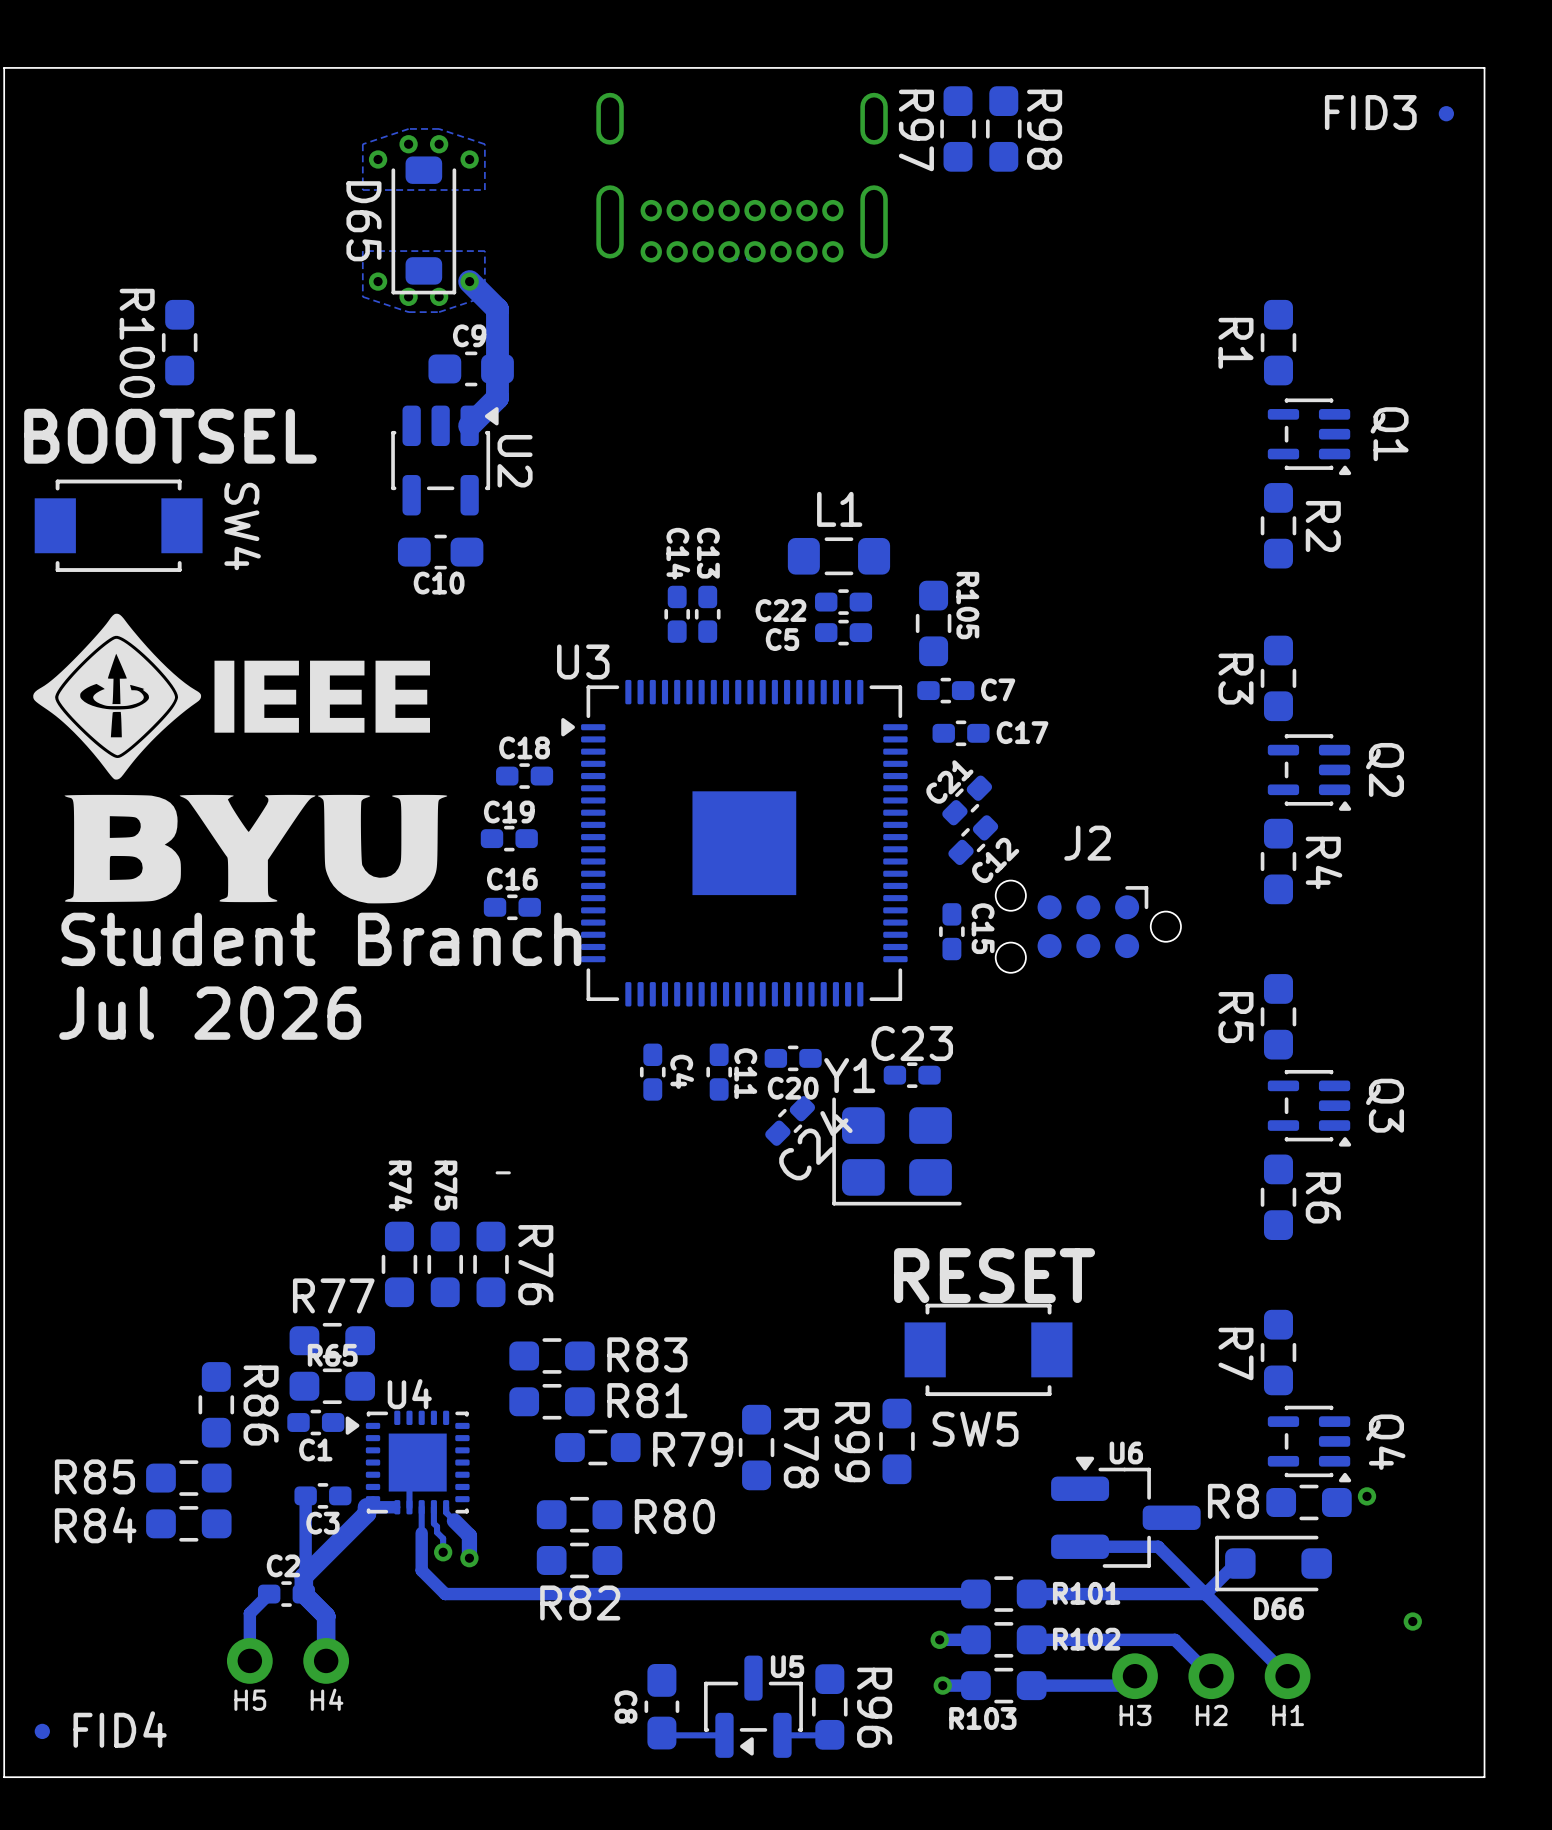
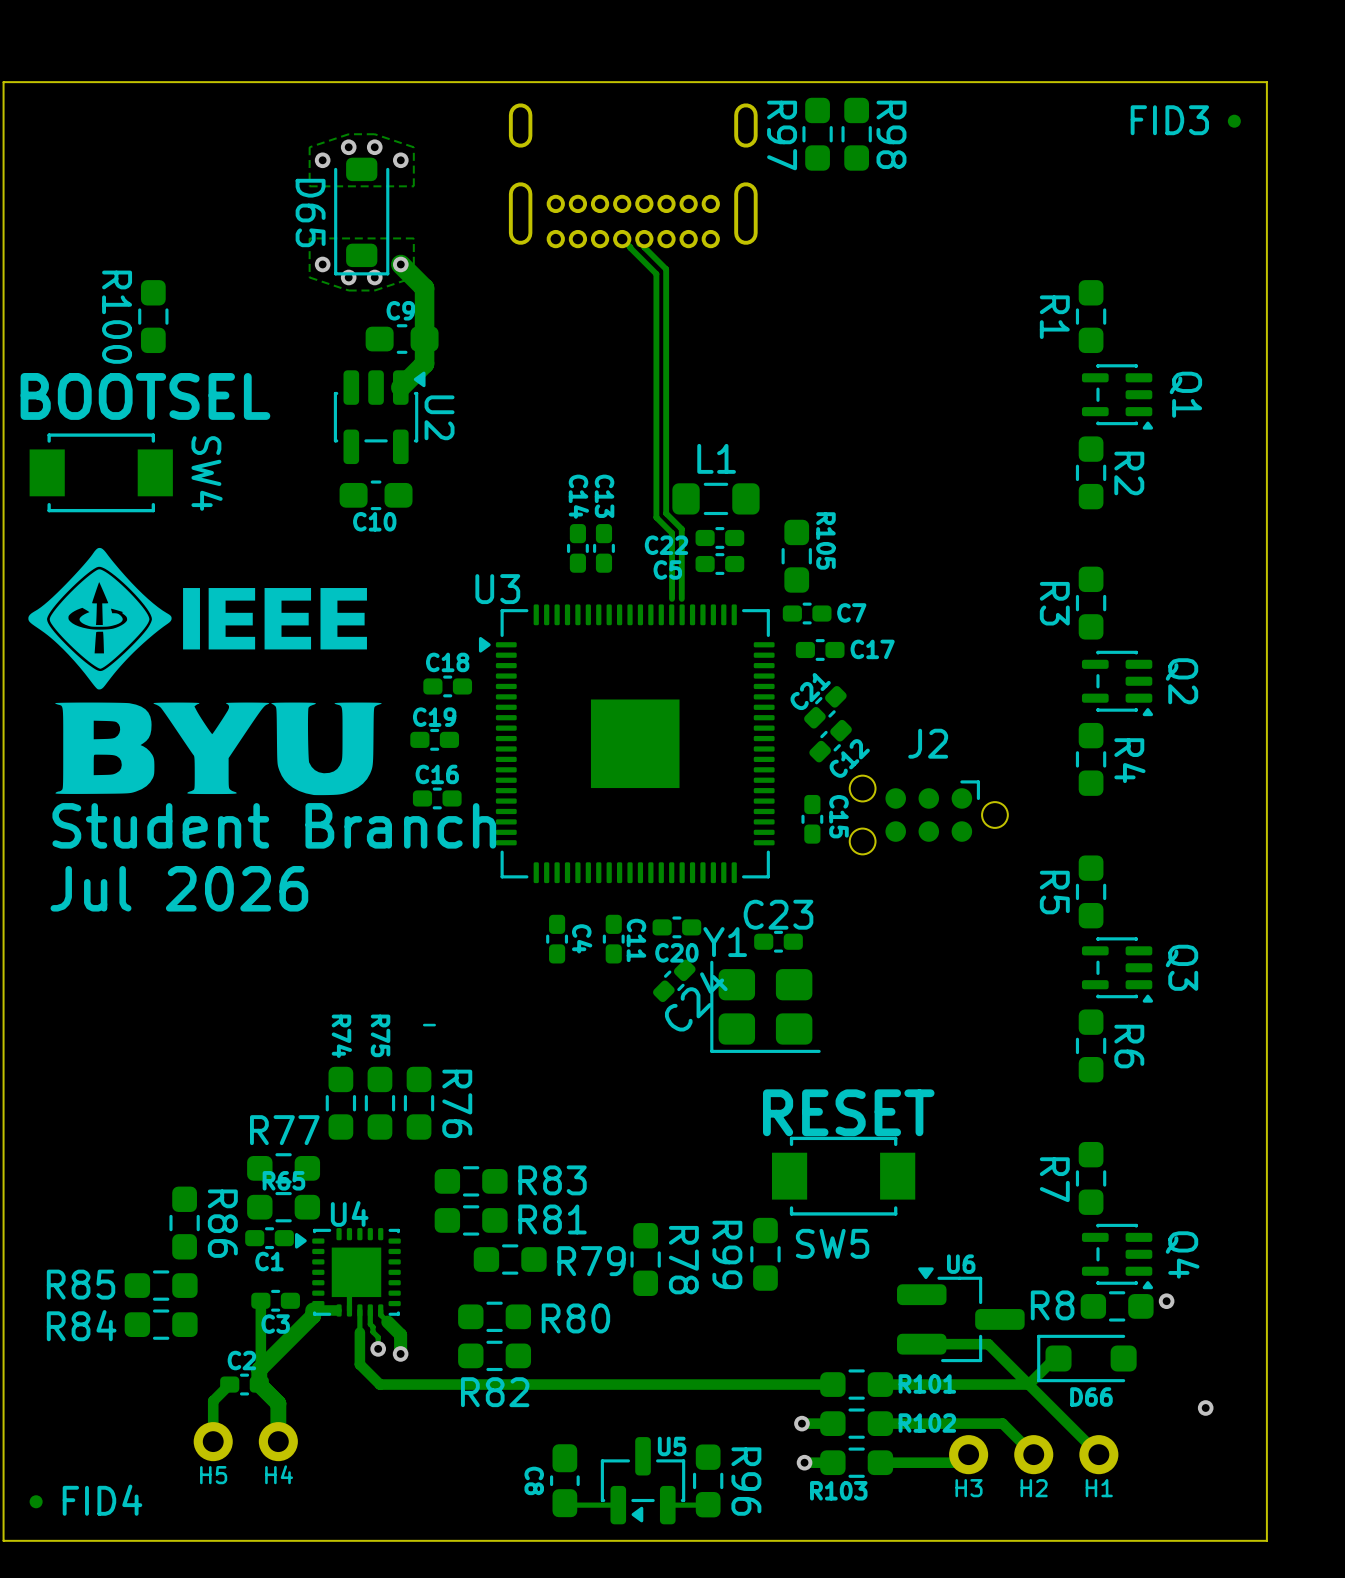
track: none -> (622, 239) (656, 273) (656, 517) (672, 533) (672, 598)
track: none -> (644, 239) (644, 247) (666, 269) (666, 513) (681, 529) (681, 598)

